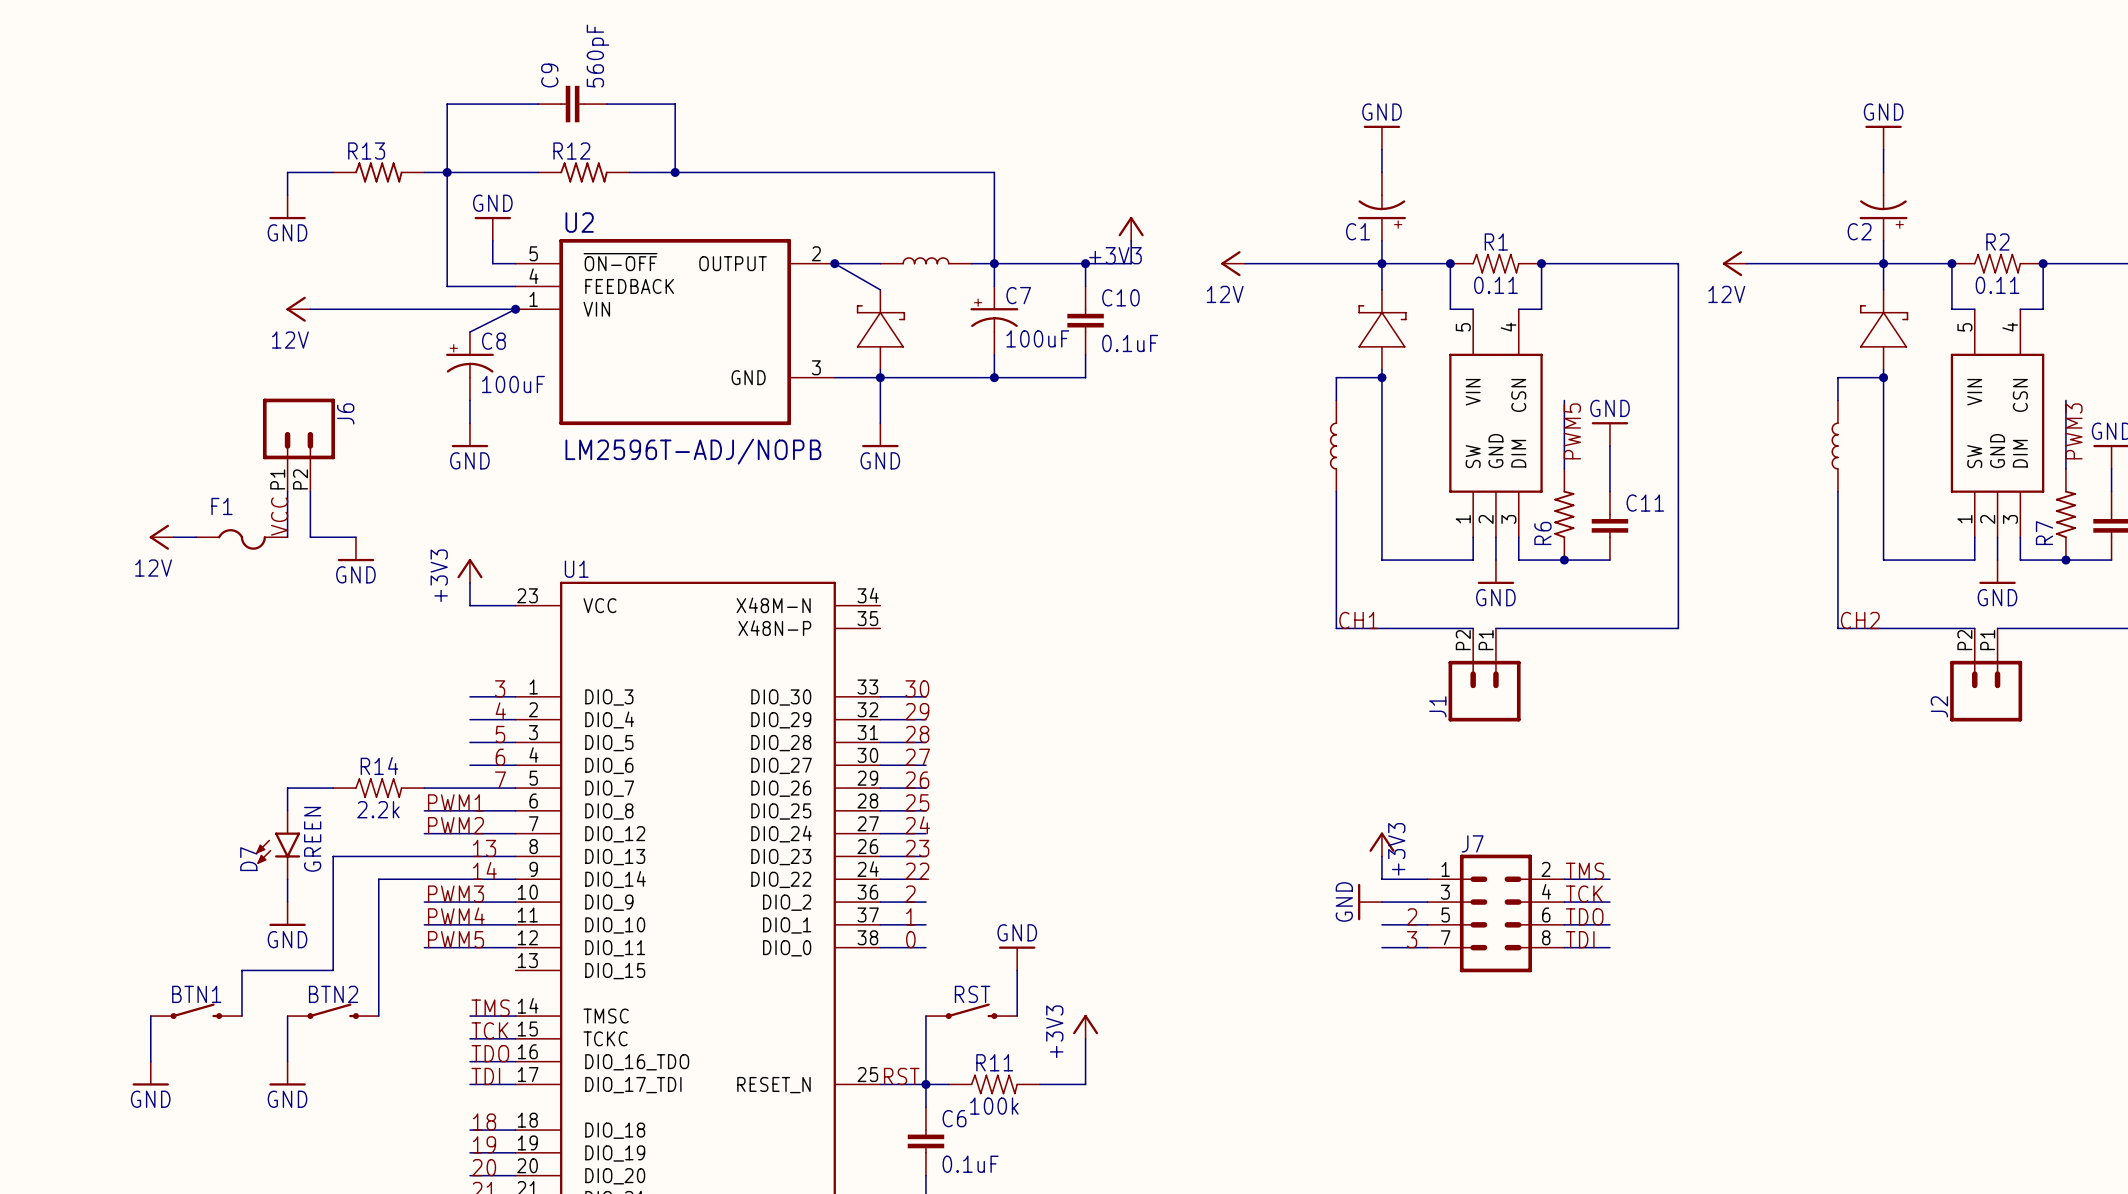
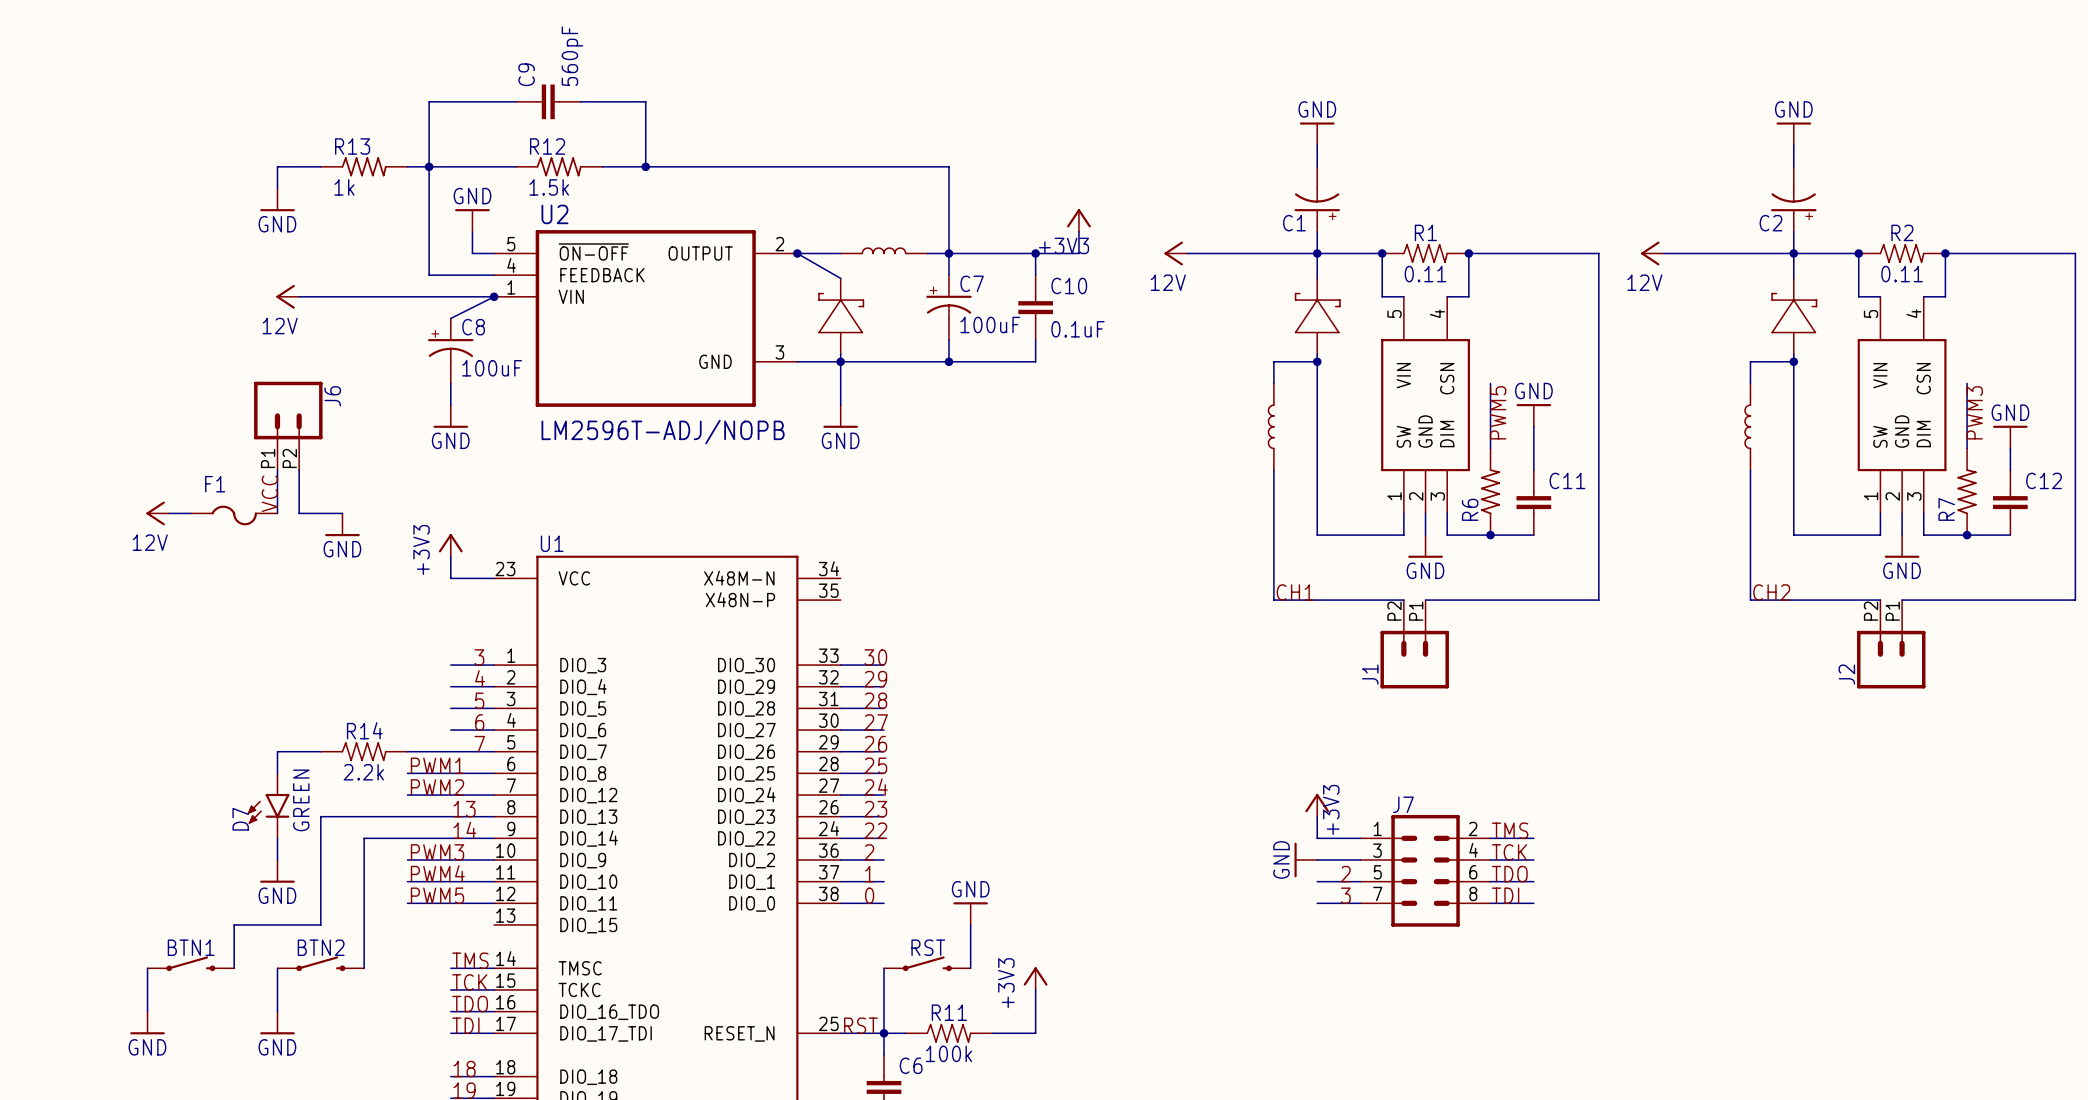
R13 value: none -> 1k (344, 187)
R12 value: none -> 1.5k (549, 187)

